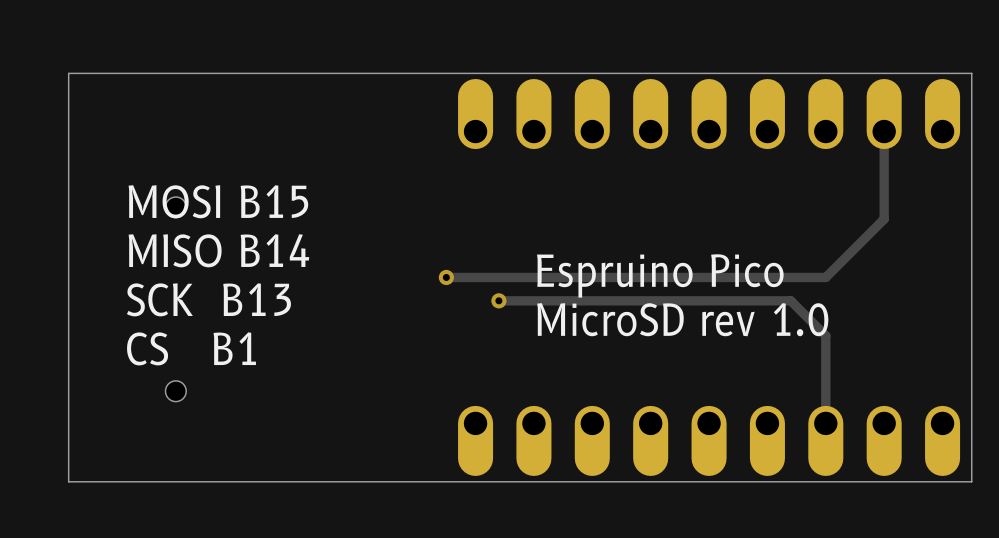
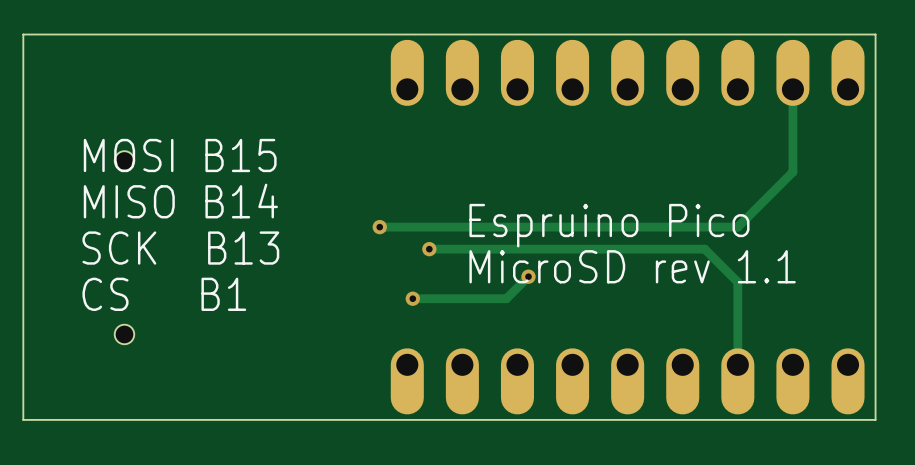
text: MicroSD rev 1.0 (682, 319) -> MicroSD rev 1.1 (632, 266)
track: none -> (528, 276) (506, 298) (412, 298)
via: none -> (528, 276)
via: none -> (412, 298)

